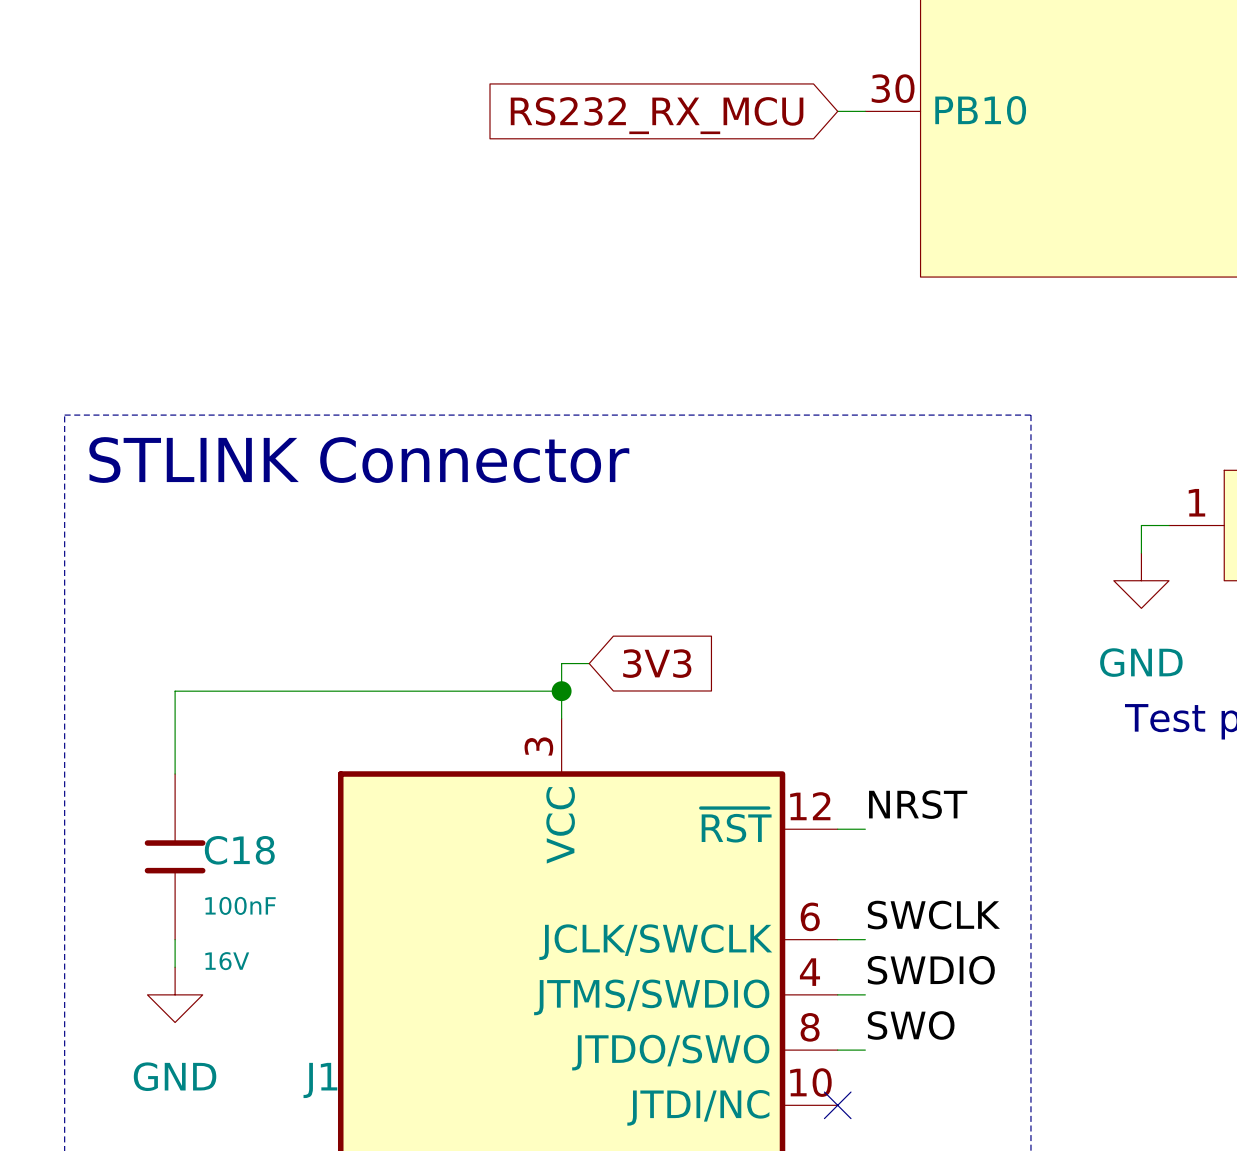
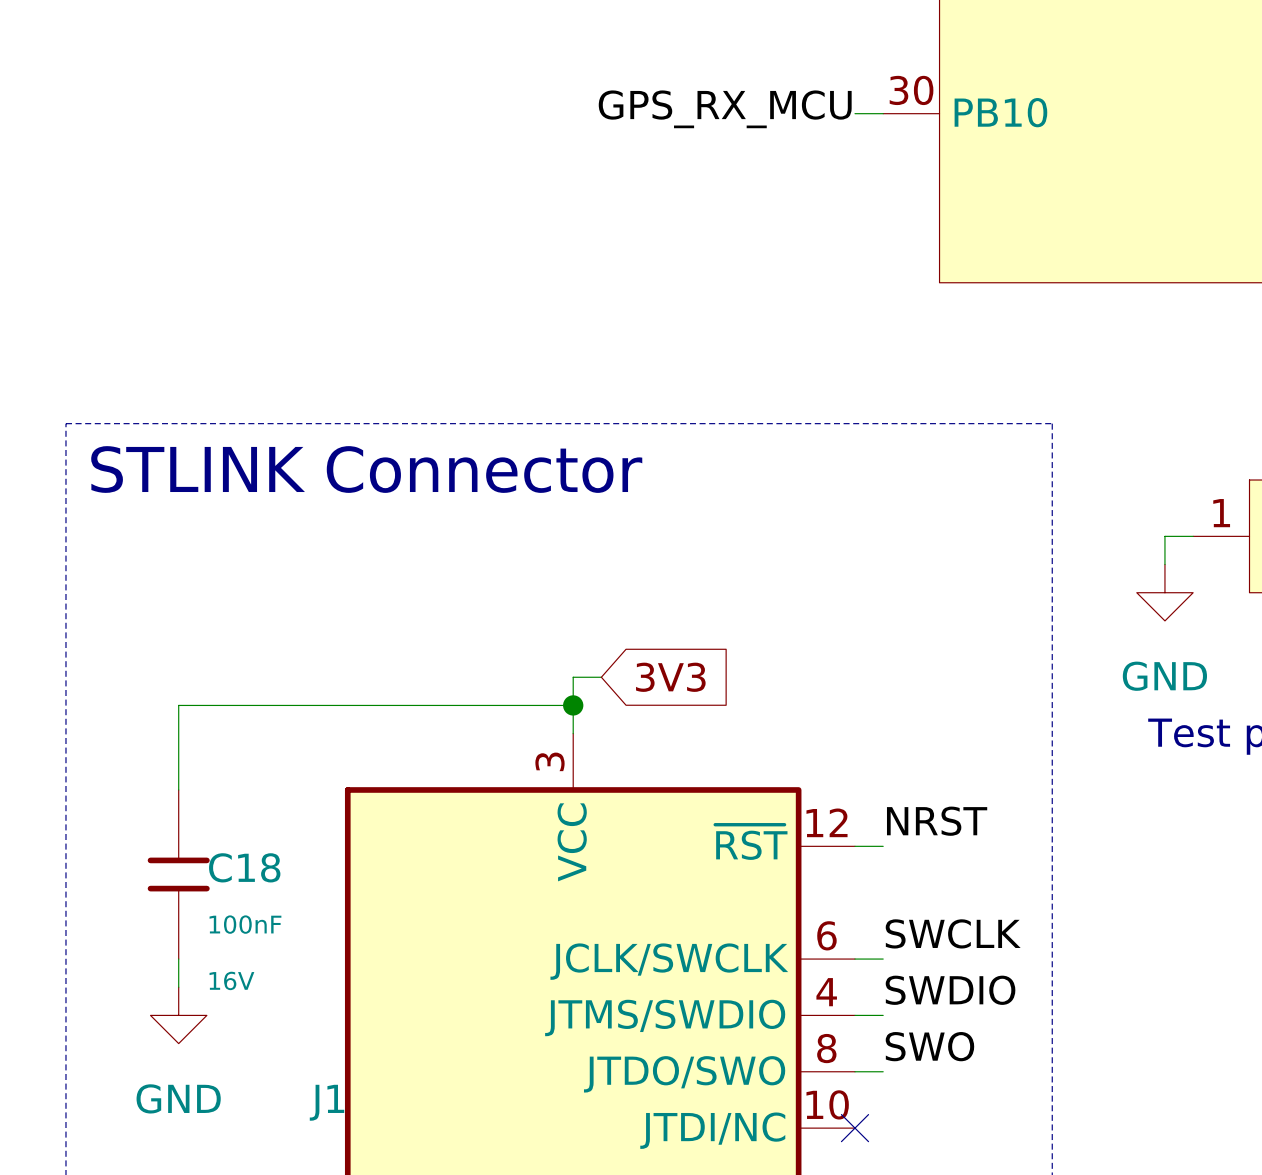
label: none -> GPS_RX_MCU (725, 109)
global label: RS232_RX_MCU (657, 115) -> none

